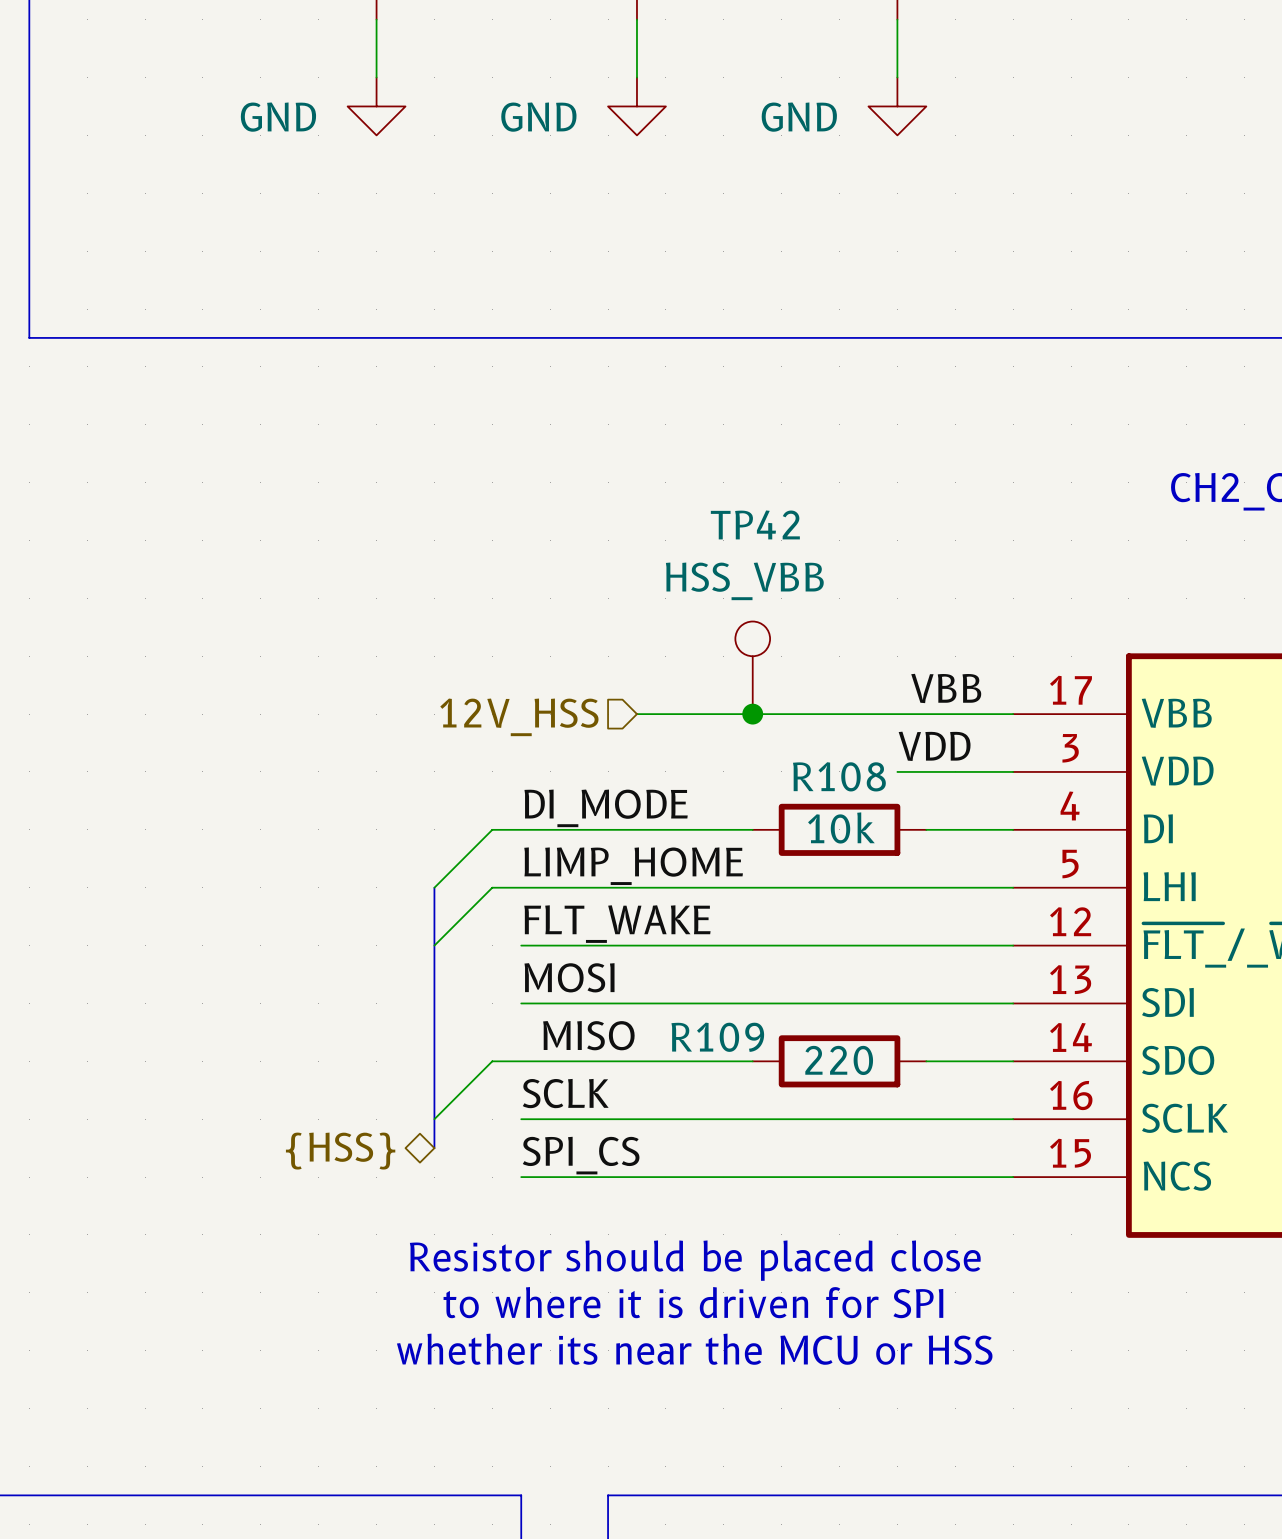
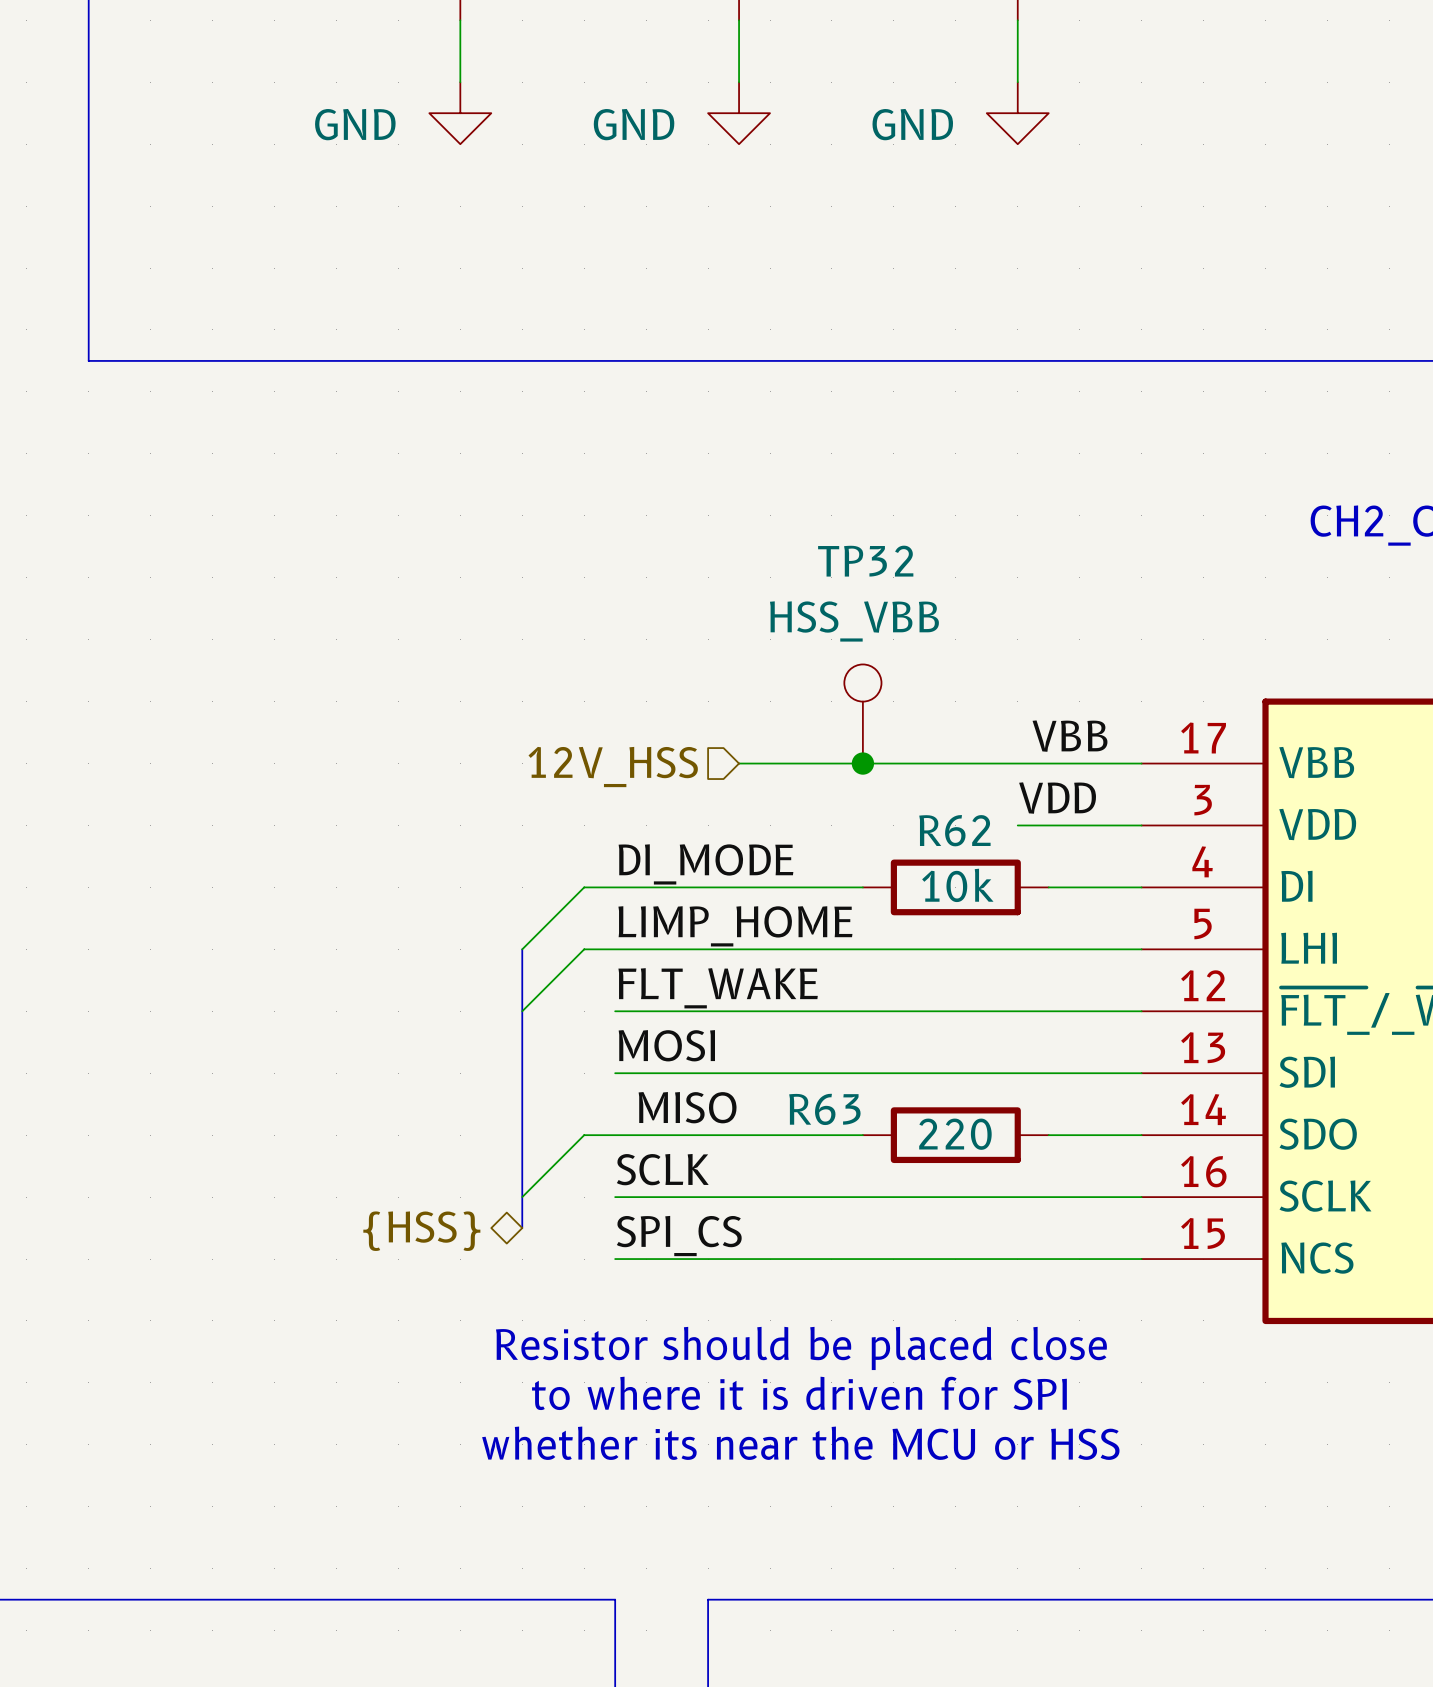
TP42 name: TP42 (755, 524) -> TP32 (865, 561)
R108 name: R108 (839, 776) -> R62 (954, 830)
R109 name: R109 (717, 1037) -> R63 (824, 1109)

